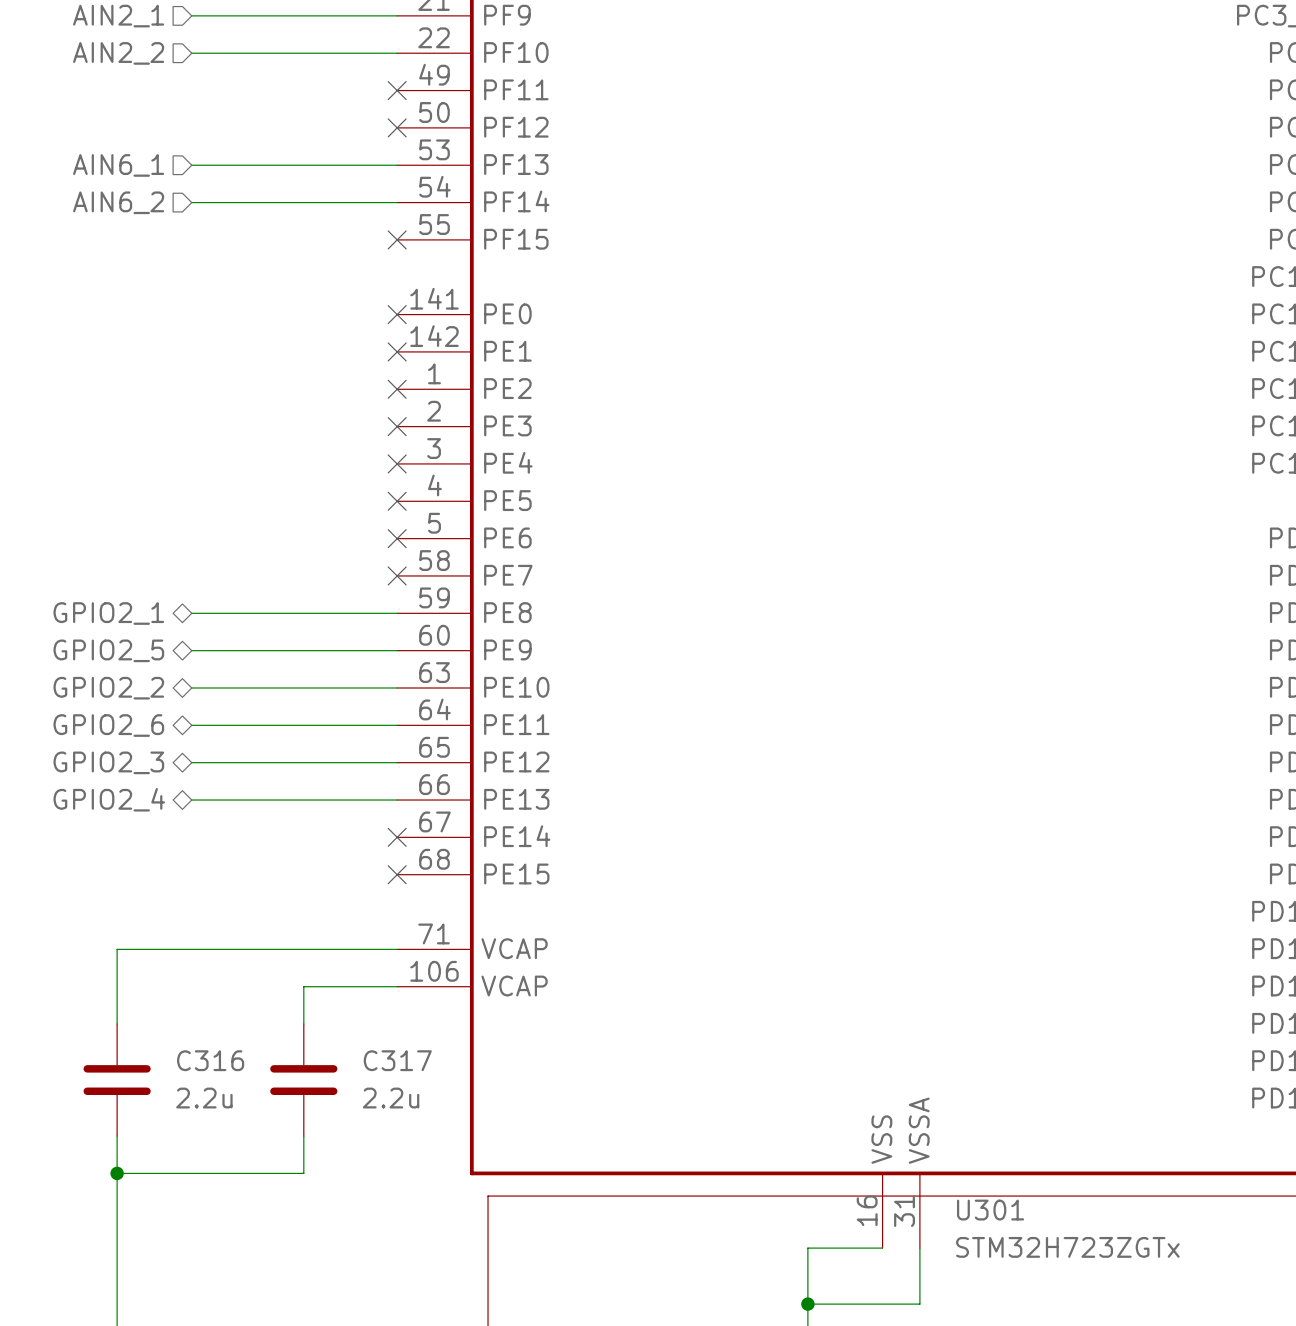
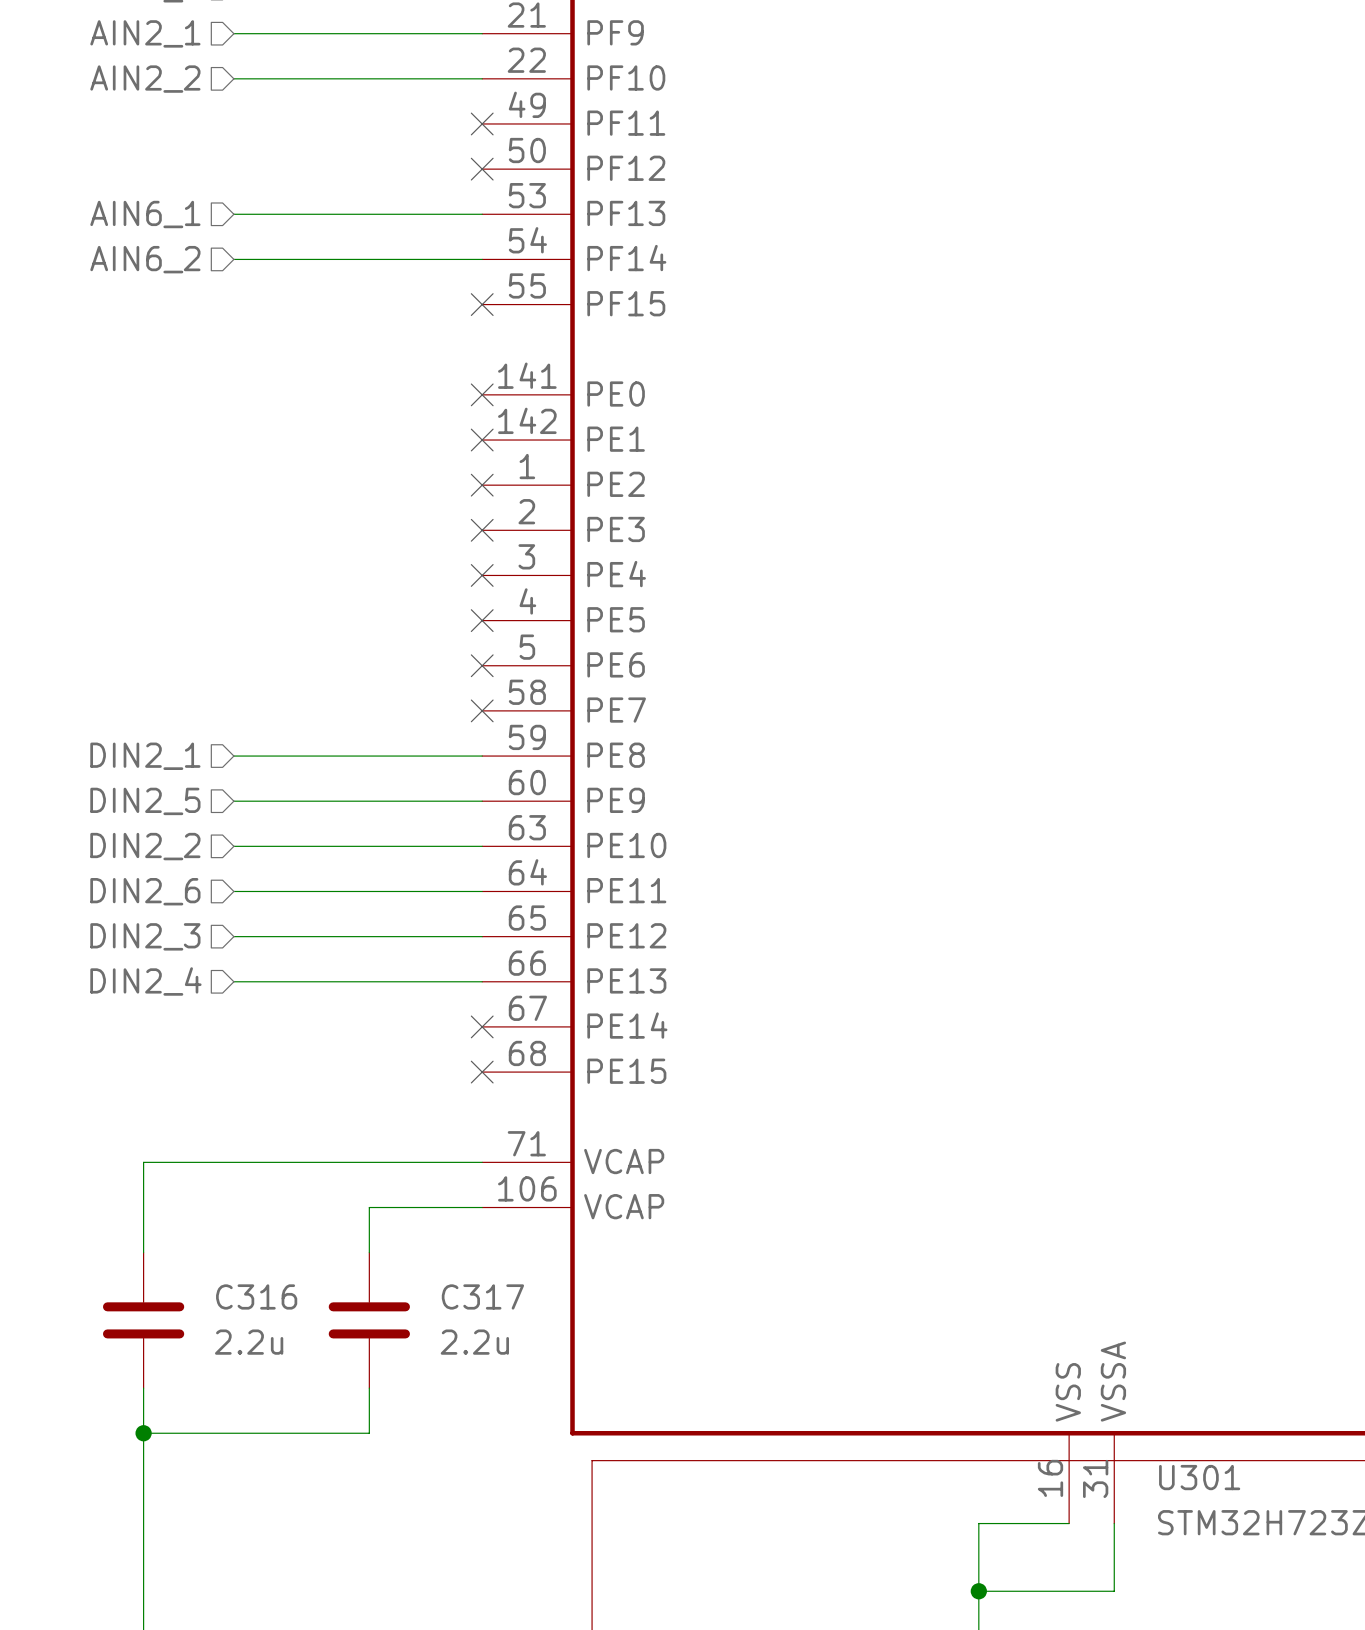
hierarchical label shape: bidirectional (108, 613) -> input (145, 756)
hierarchical label: GPIO2_1 (108, 613) -> DIN2_1 (145, 756)
hierarchical label shape: bidirectional (108, 650) -> input (145, 801)
hierarchical label: GPIO2_5 (108, 650) -> DIN2_5 (145, 801)
hierarchical label shape: bidirectional (108, 688) -> input (145, 846)
hierarchical label: GPIO2_2 (108, 688) -> DIN2_2 (145, 846)
hierarchical label shape: bidirectional (108, 725) -> input (145, 891)
hierarchical label: GPIO2_6 (108, 725) -> DIN2_6 (145, 891)
hierarchical label shape: bidirectional (108, 762) -> input (145, 936)
hierarchical label: GPIO2_3 (108, 762) -> DIN2_3 (145, 936)
hierarchical label shape: bidirectional (109, 799) -> input (145, 981)
hierarchical label: GPIO2_4 (109, 799) -> DIN2_4 (145, 981)

